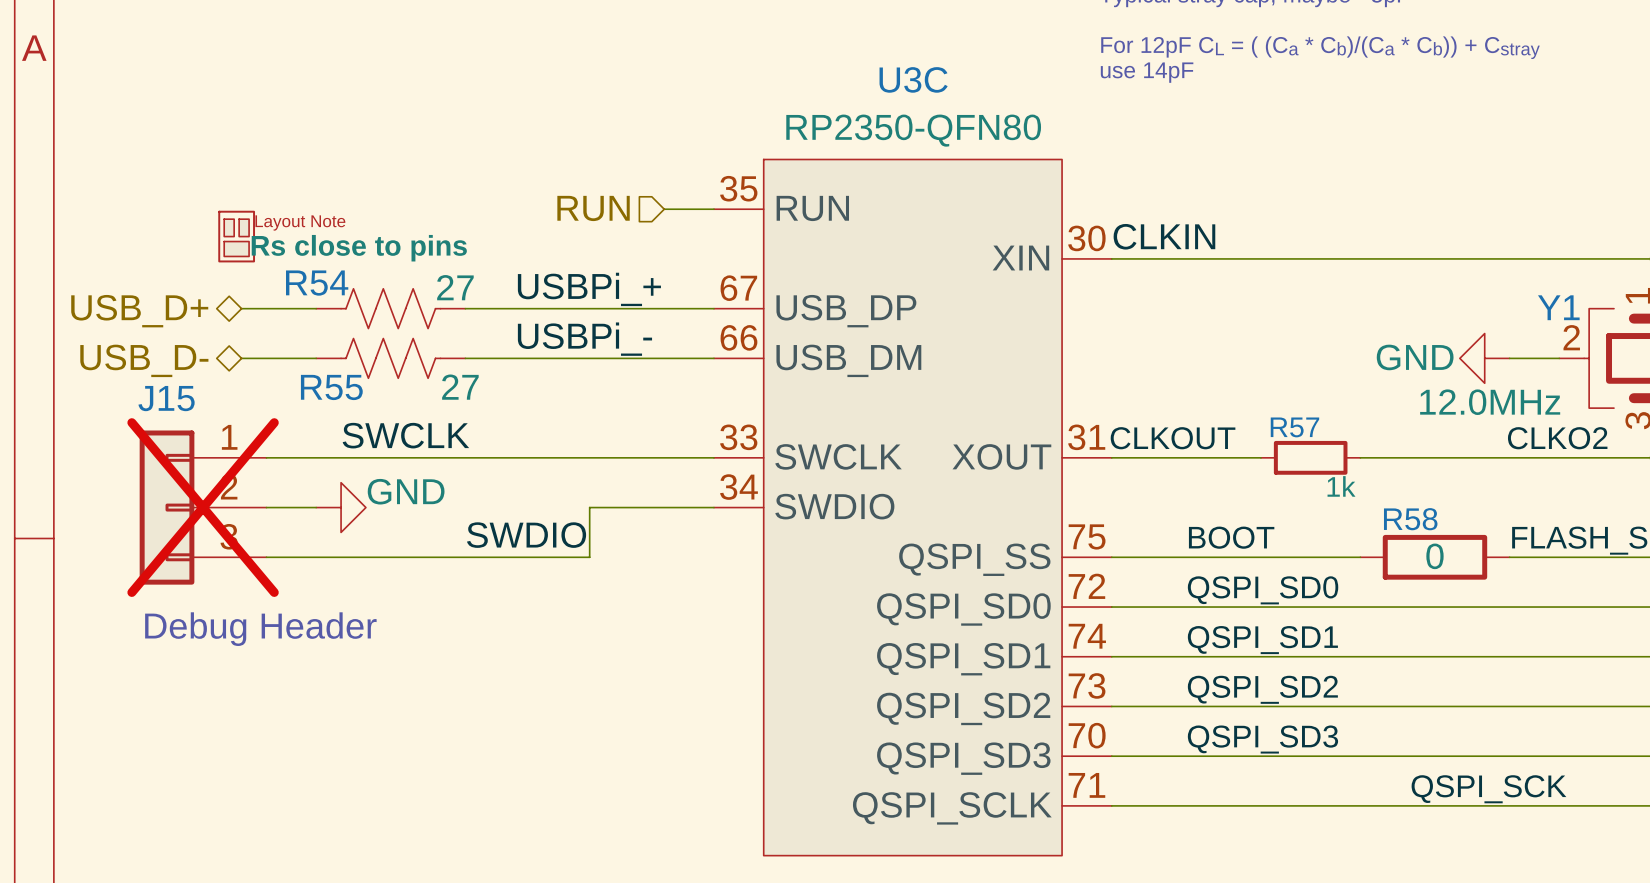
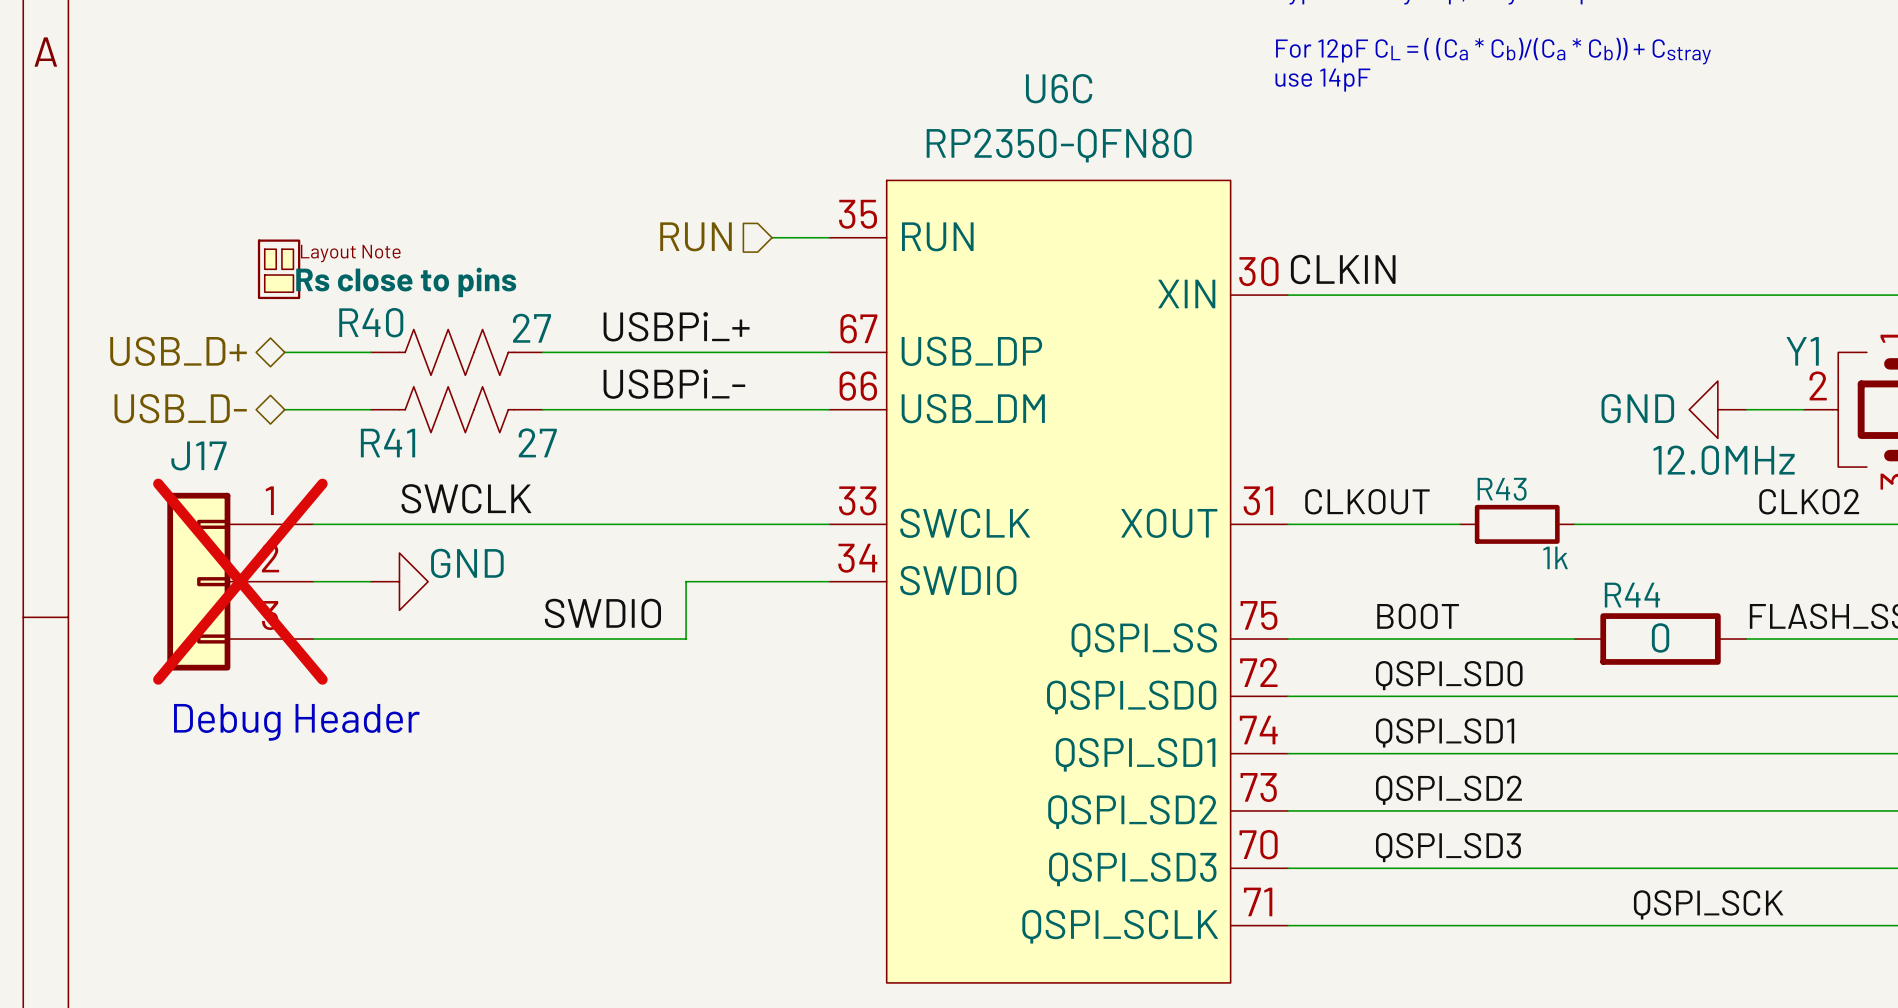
U3C name: U3C (913, 79) -> U6C (1059, 88)
R54 name: R54 (317, 283) -> R40 (371, 322)
R55 name: R55 (331, 387) -> R41 (388, 443)
J15 name: J15 (166, 398) -> J17 (198, 455)
R57 name: R57 (1294, 427) -> R43 (1502, 489)
R58 name: R58 (1410, 519) -> R44 (1632, 595)

